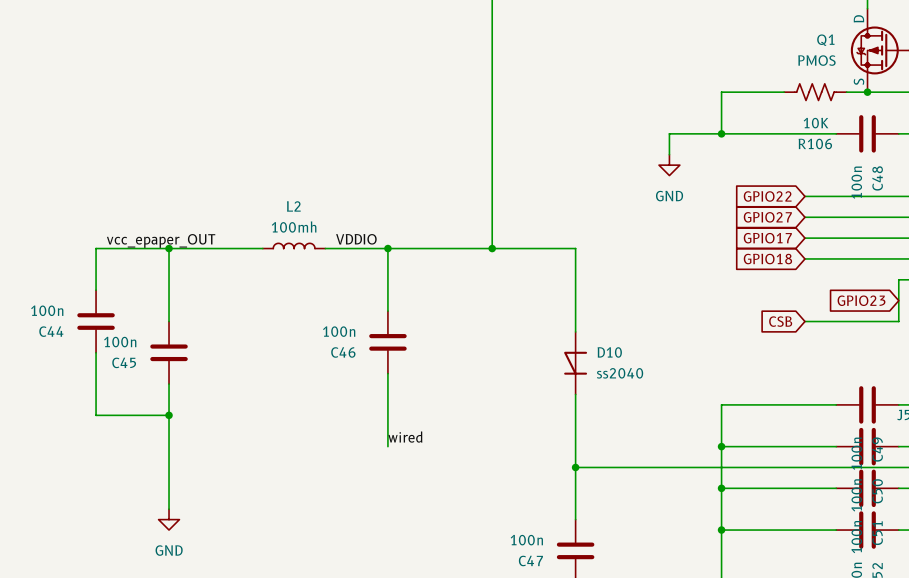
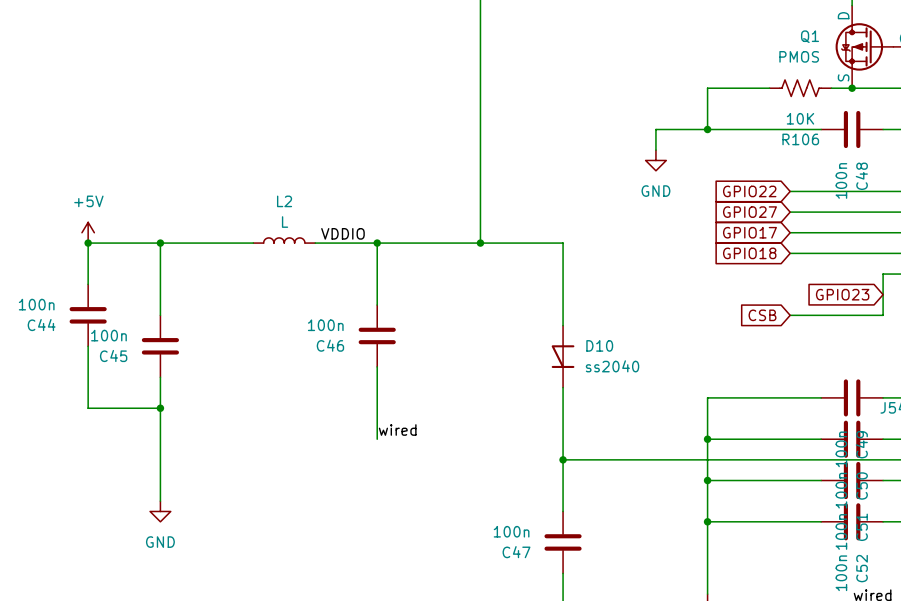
L2 value: 100mh (294, 227) -> L (285, 222)
power symbol: none -> +5V (88, 232)
label: vcc_epaper_OUT (161, 240) -> none
junction: none -> (88, 243)

